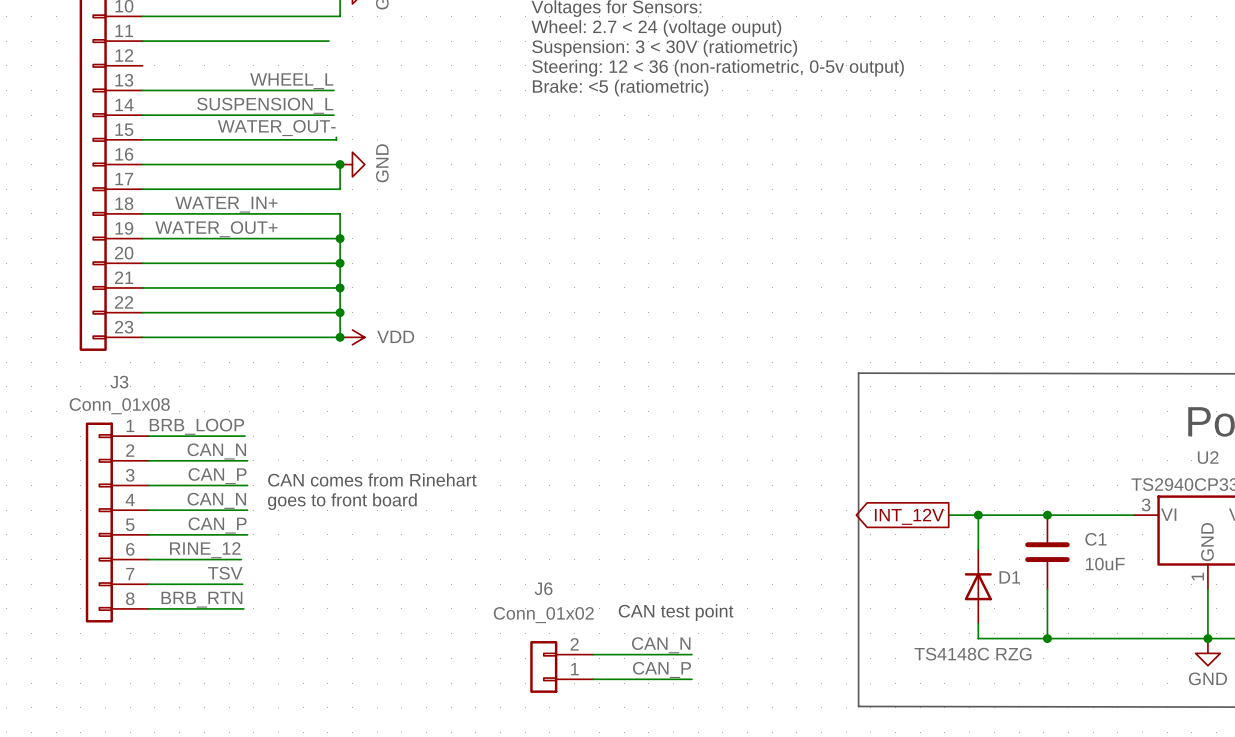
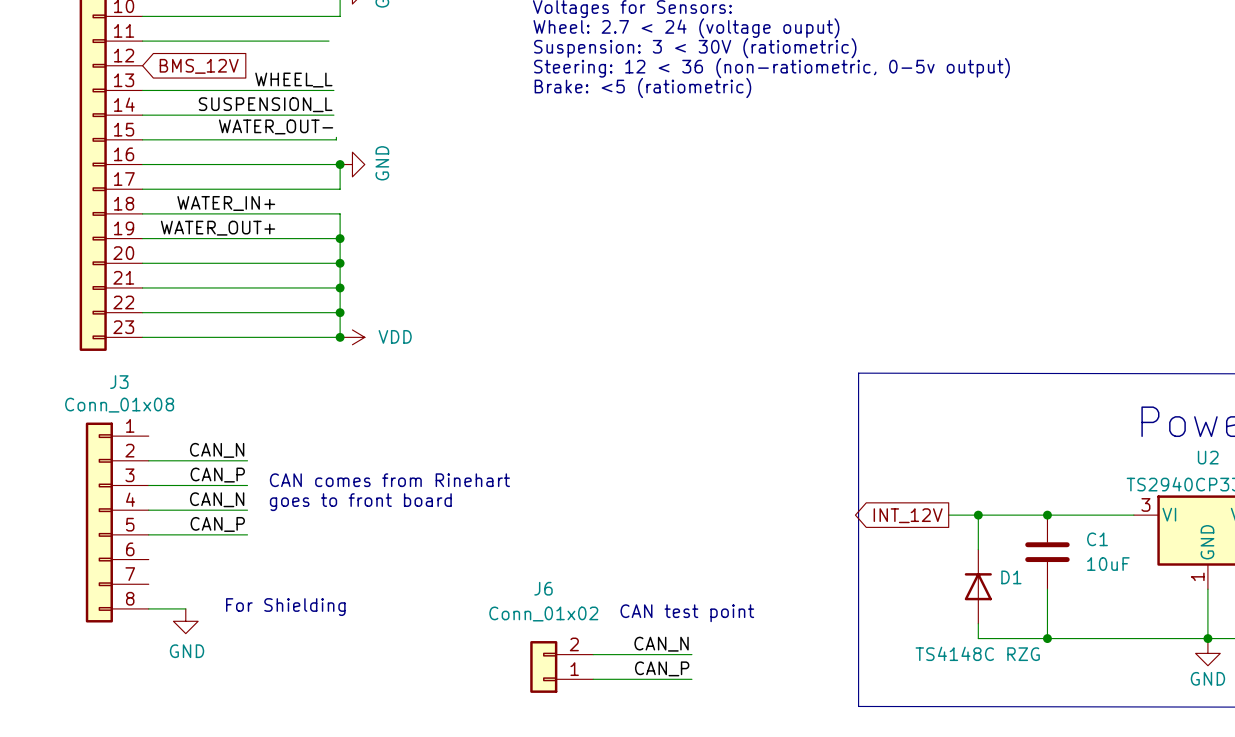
global label: none -> BMS_12V (199, 66)
label: BRB_LOOP (196, 426) -> none
wire: (148, 436) (245, 436) -> none
label: RINE_12 (205, 550) -> none
wire: (148, 559) (241, 559) -> none
label: TSV (225, 573) -> none
wire: (148, 584) (242, 584) -> none
label: BRB_RTN (201, 599) -> none
text: none -> For Shielding (285, 607)
wire: (185, 608) (243, 608) -> none
power symbol: none -> GND (185, 621)

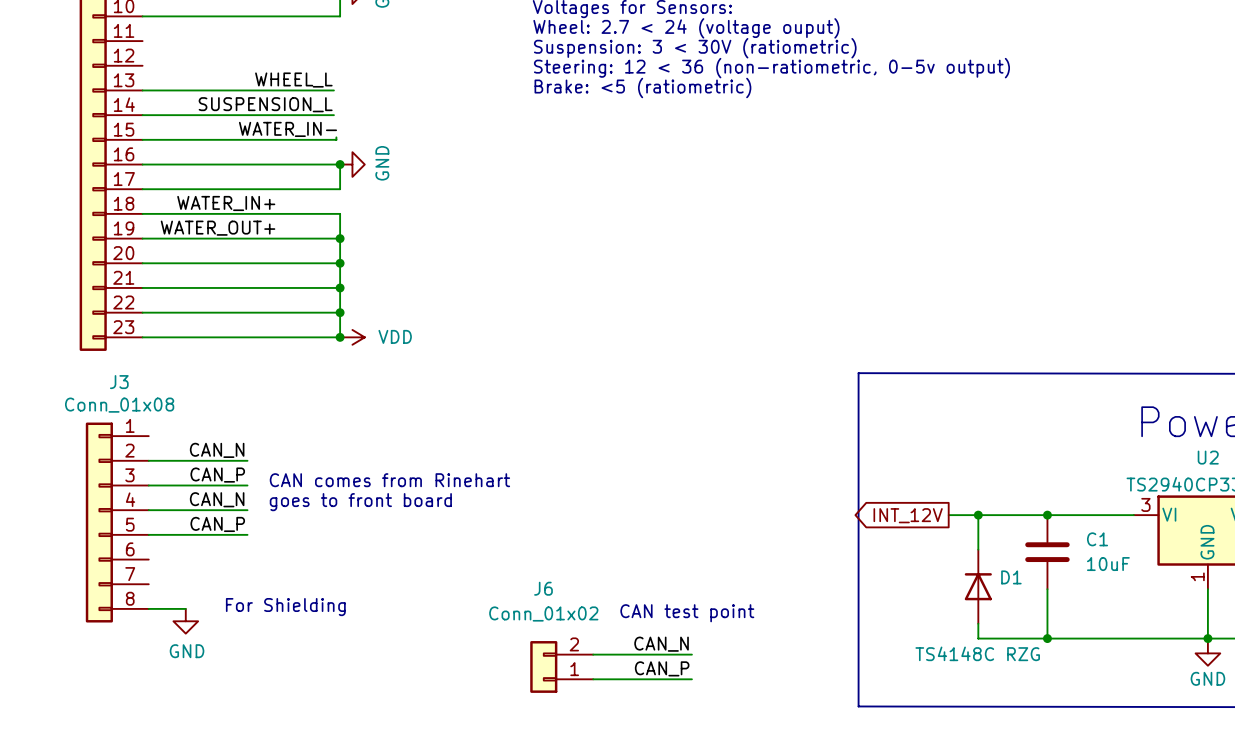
wire: (142, 41) (328, 41) -> none
global label: BMS_12V (199, 66) -> none
label: WATER_OUT- (276, 126) -> WATER_IN- (287, 129)

